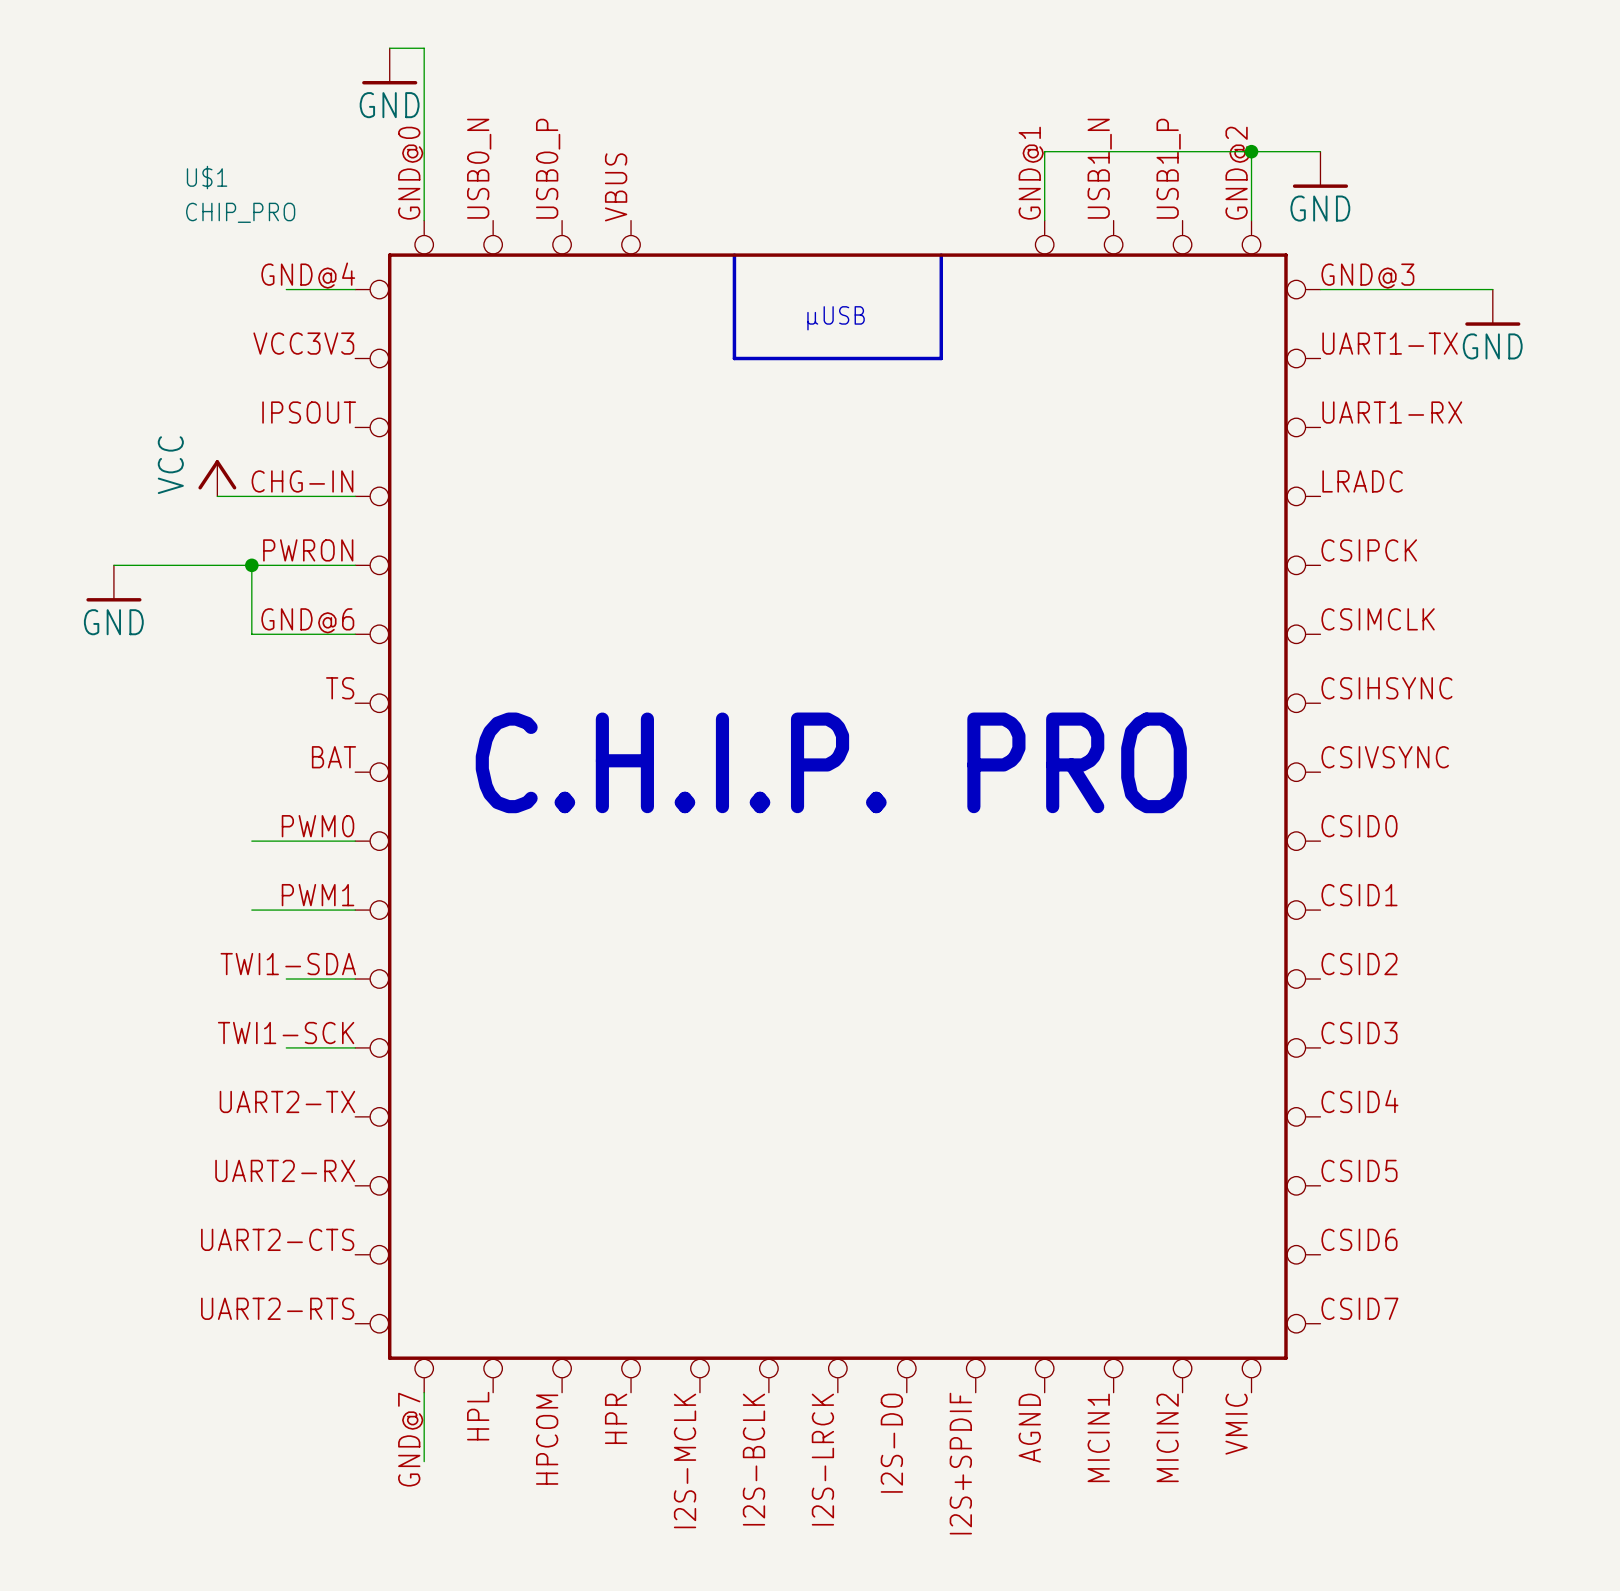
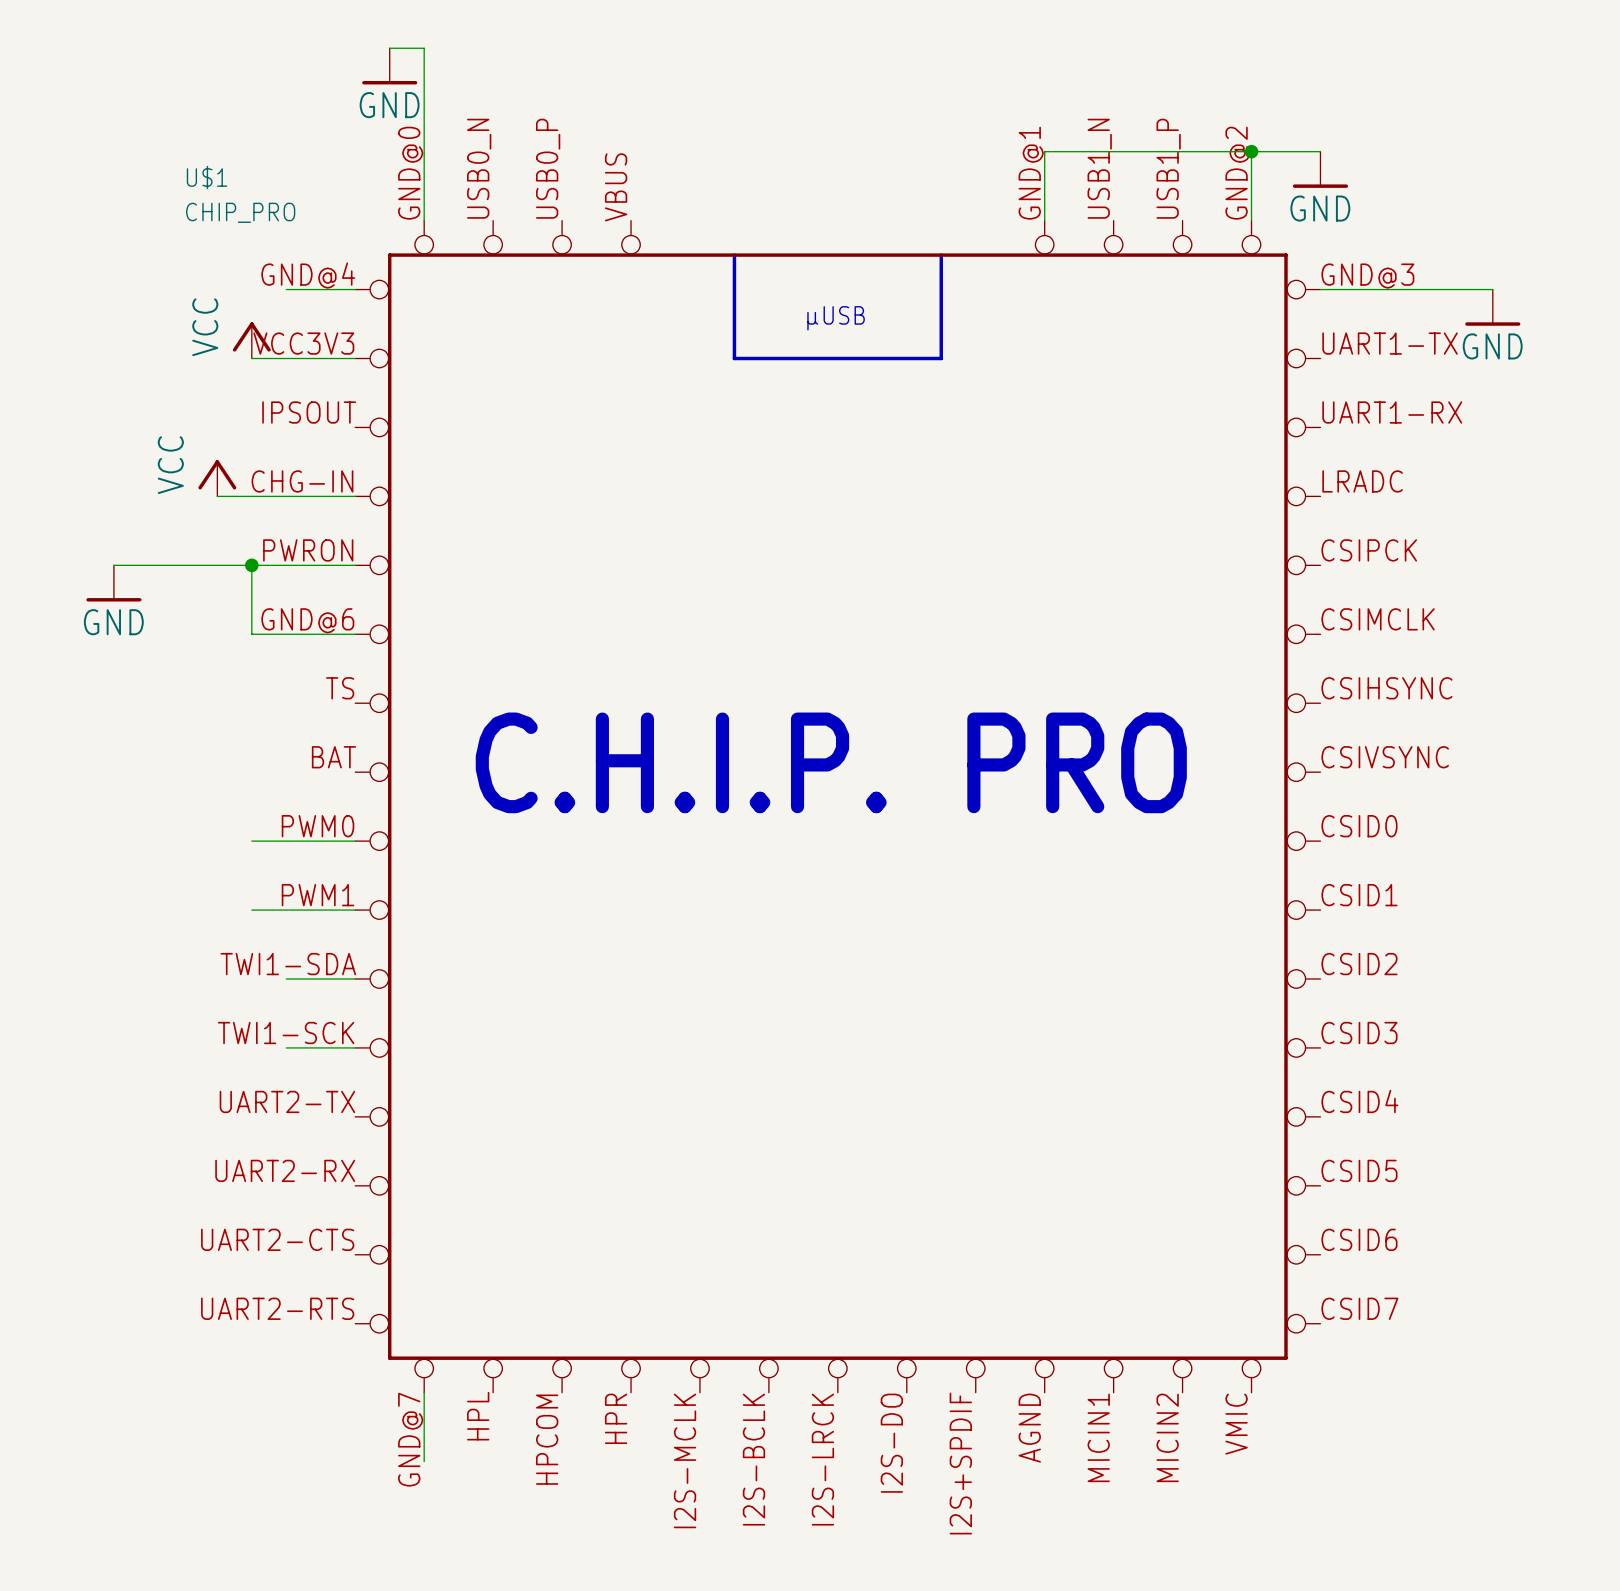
power symbol: none -> VCC (251, 340)
wire: none -> (251, 358) (355, 358)

